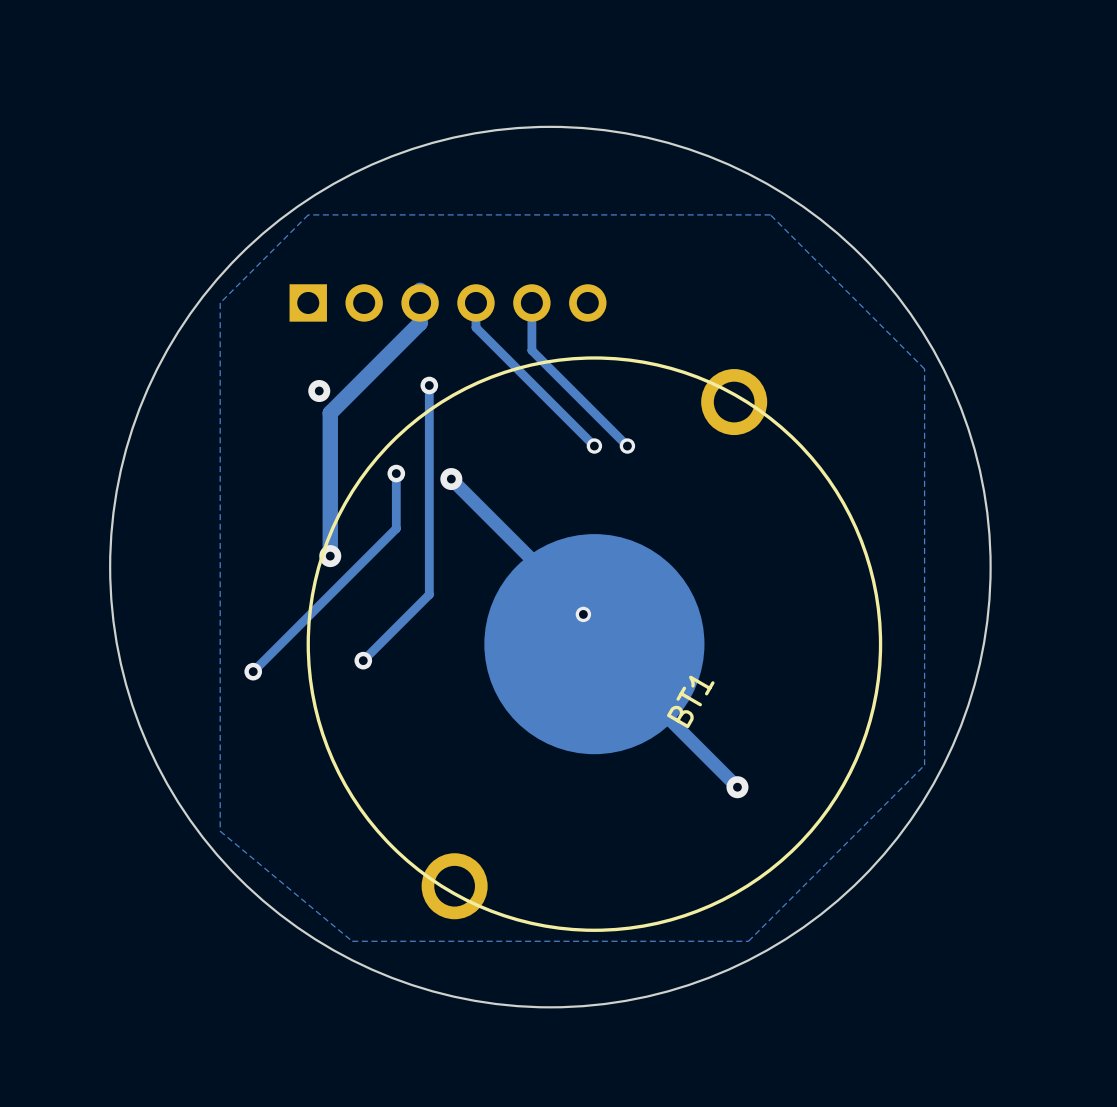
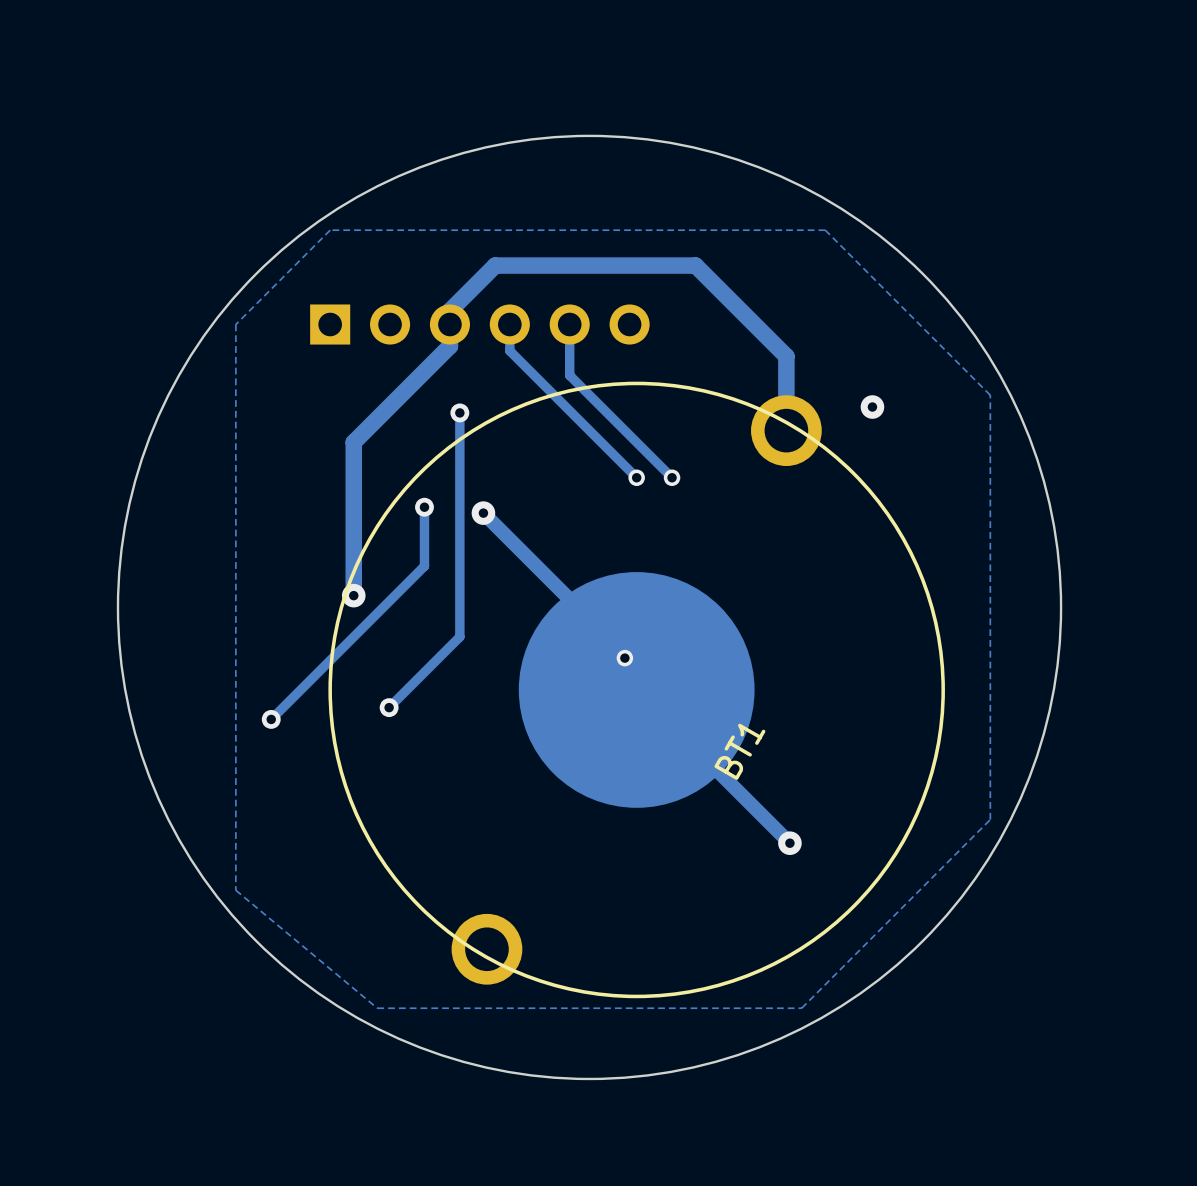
track: none -> (449, 310) (495, 265) (695, 265) (786, 356) (786, 430)
via: none -> (872, 407)
via: (319, 391) -> none

